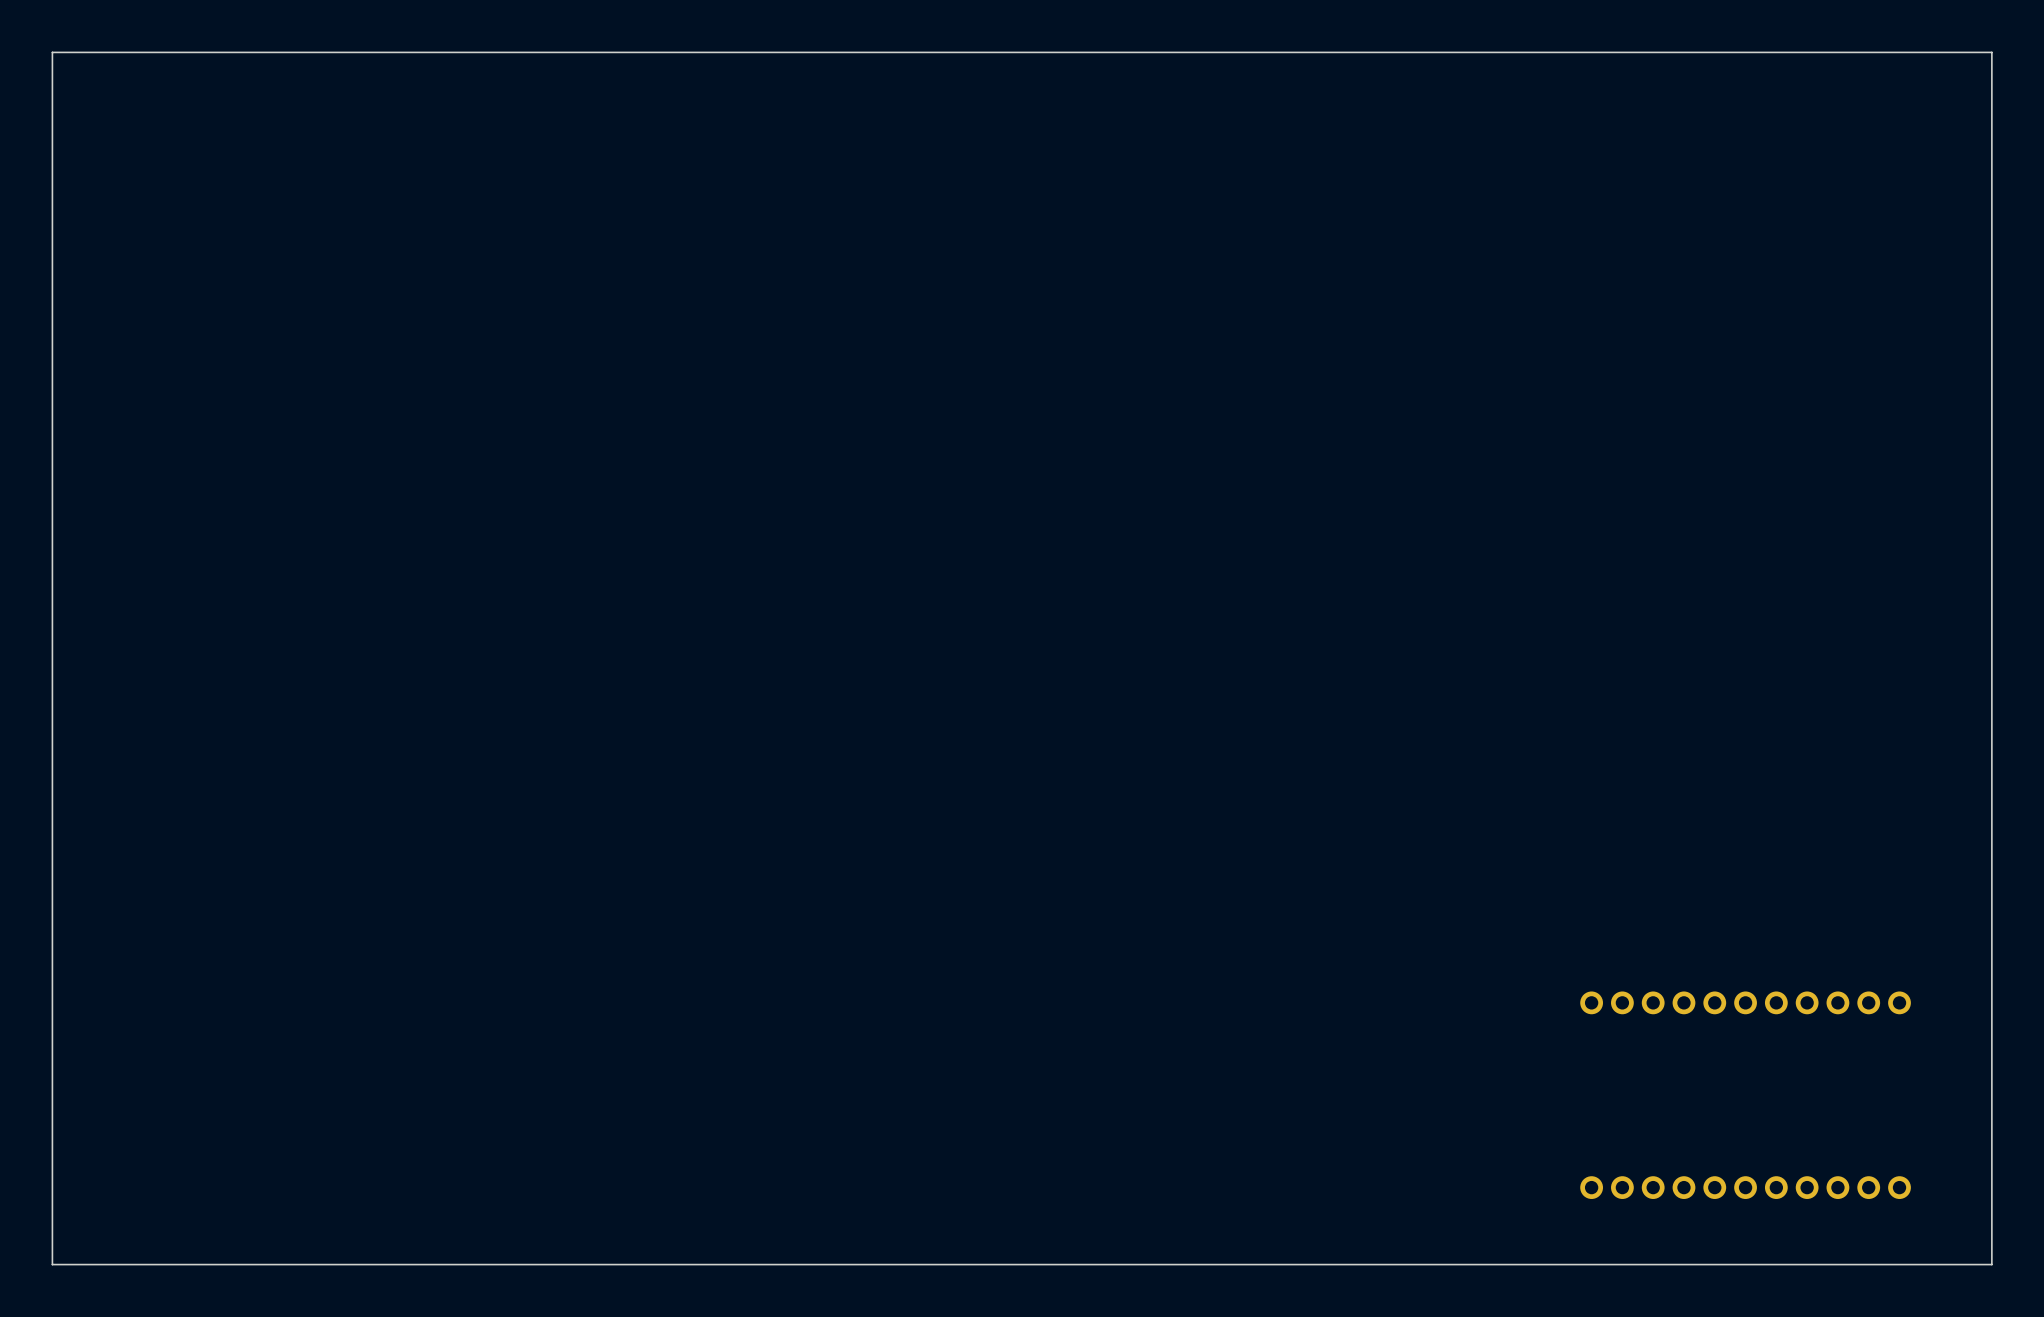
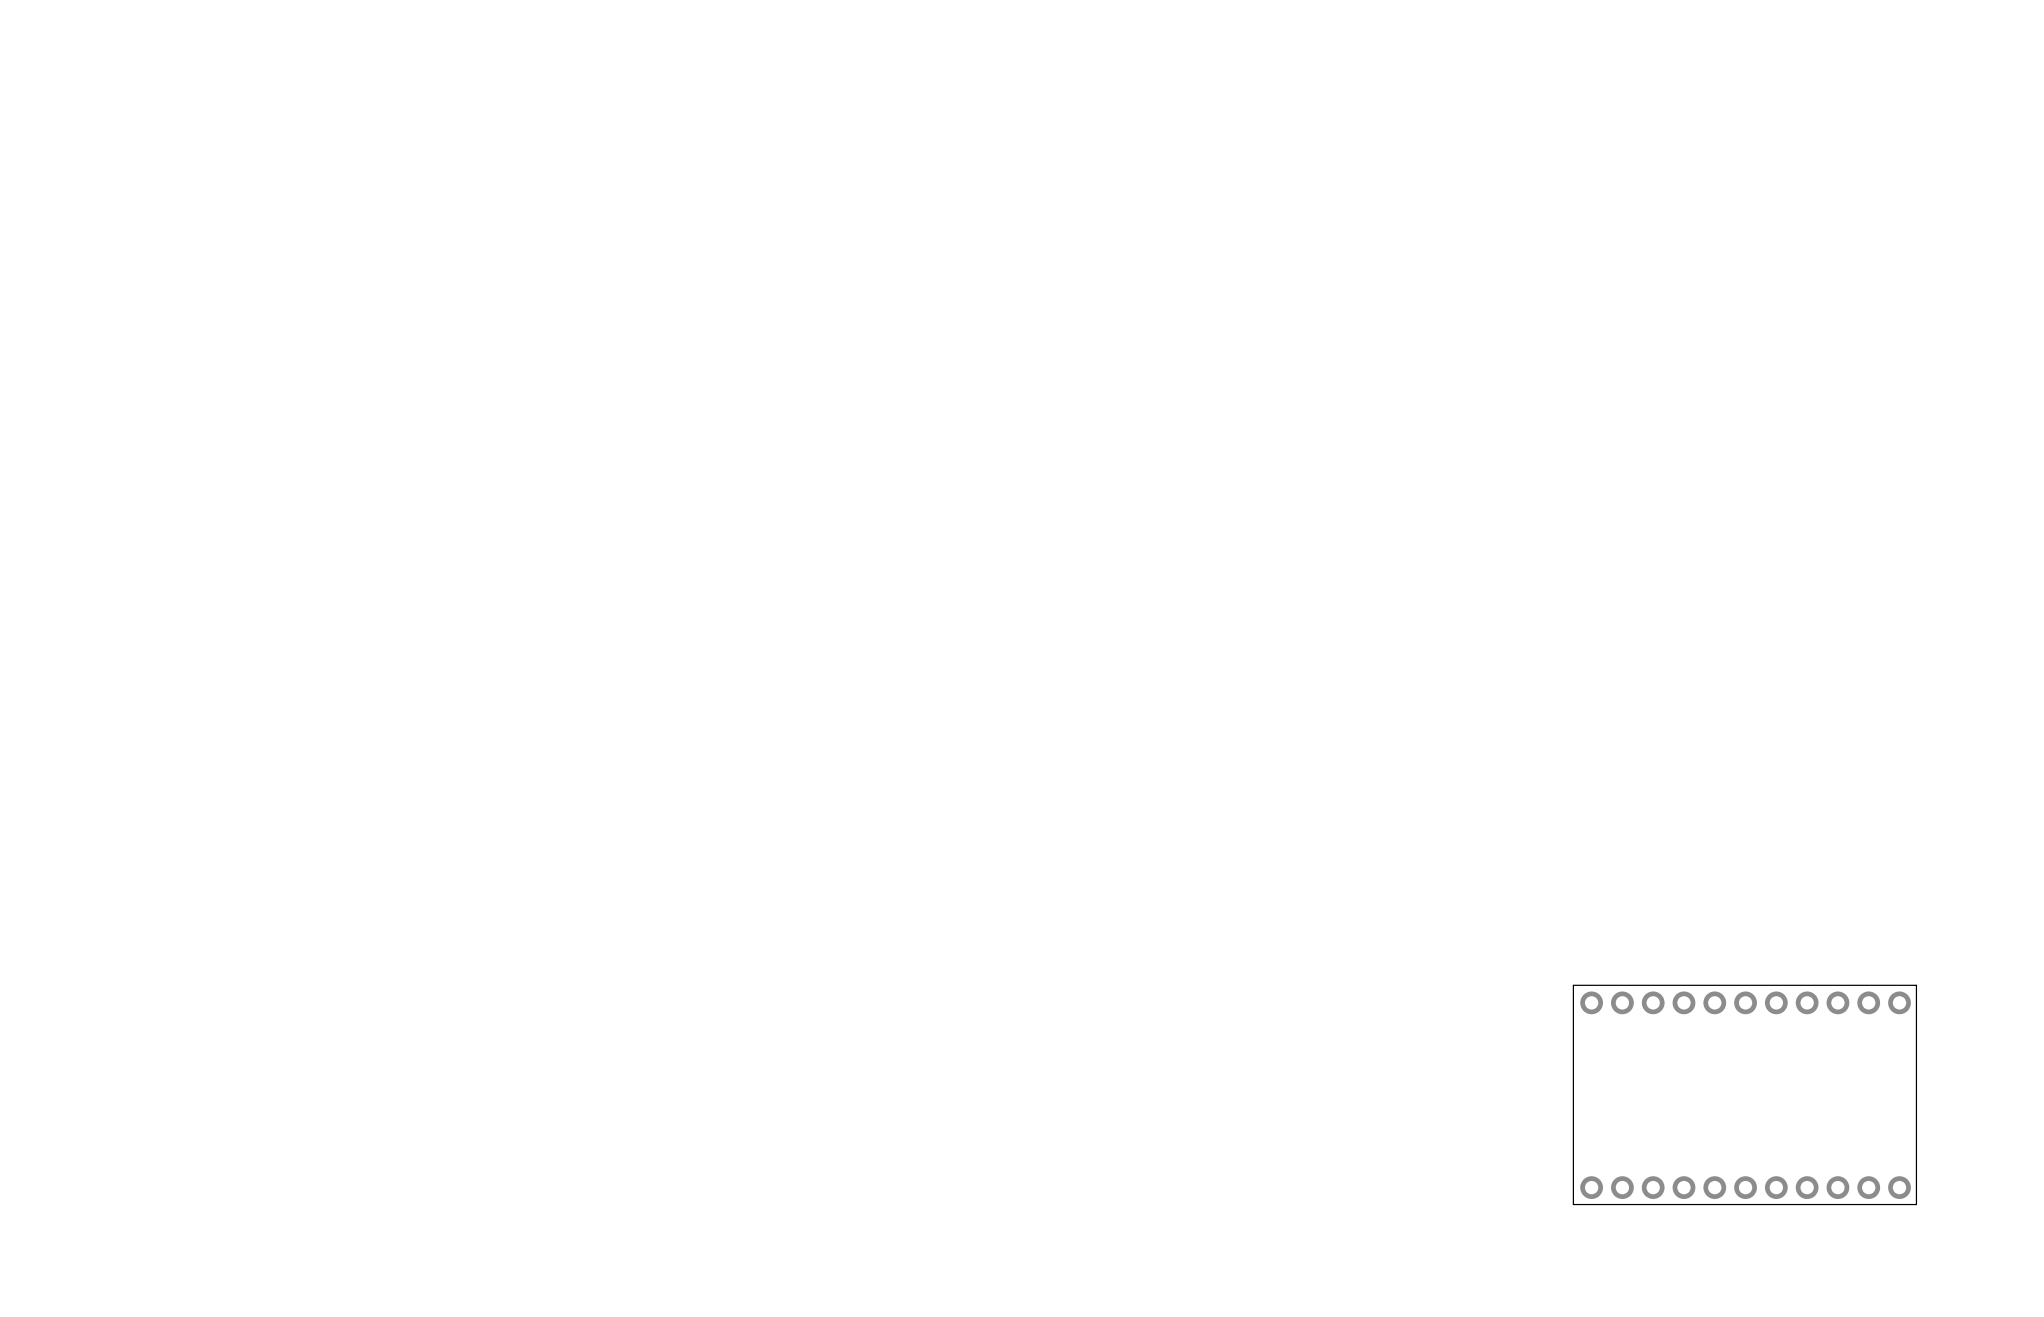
board edge: (1991, 52) (52, 52) (52, 1264) (1991, 1264) (1991, 52) -> none
board edge: none -> (1916, 985) (1573, 985) (1573, 1204) (1916, 1204) (1916, 985)

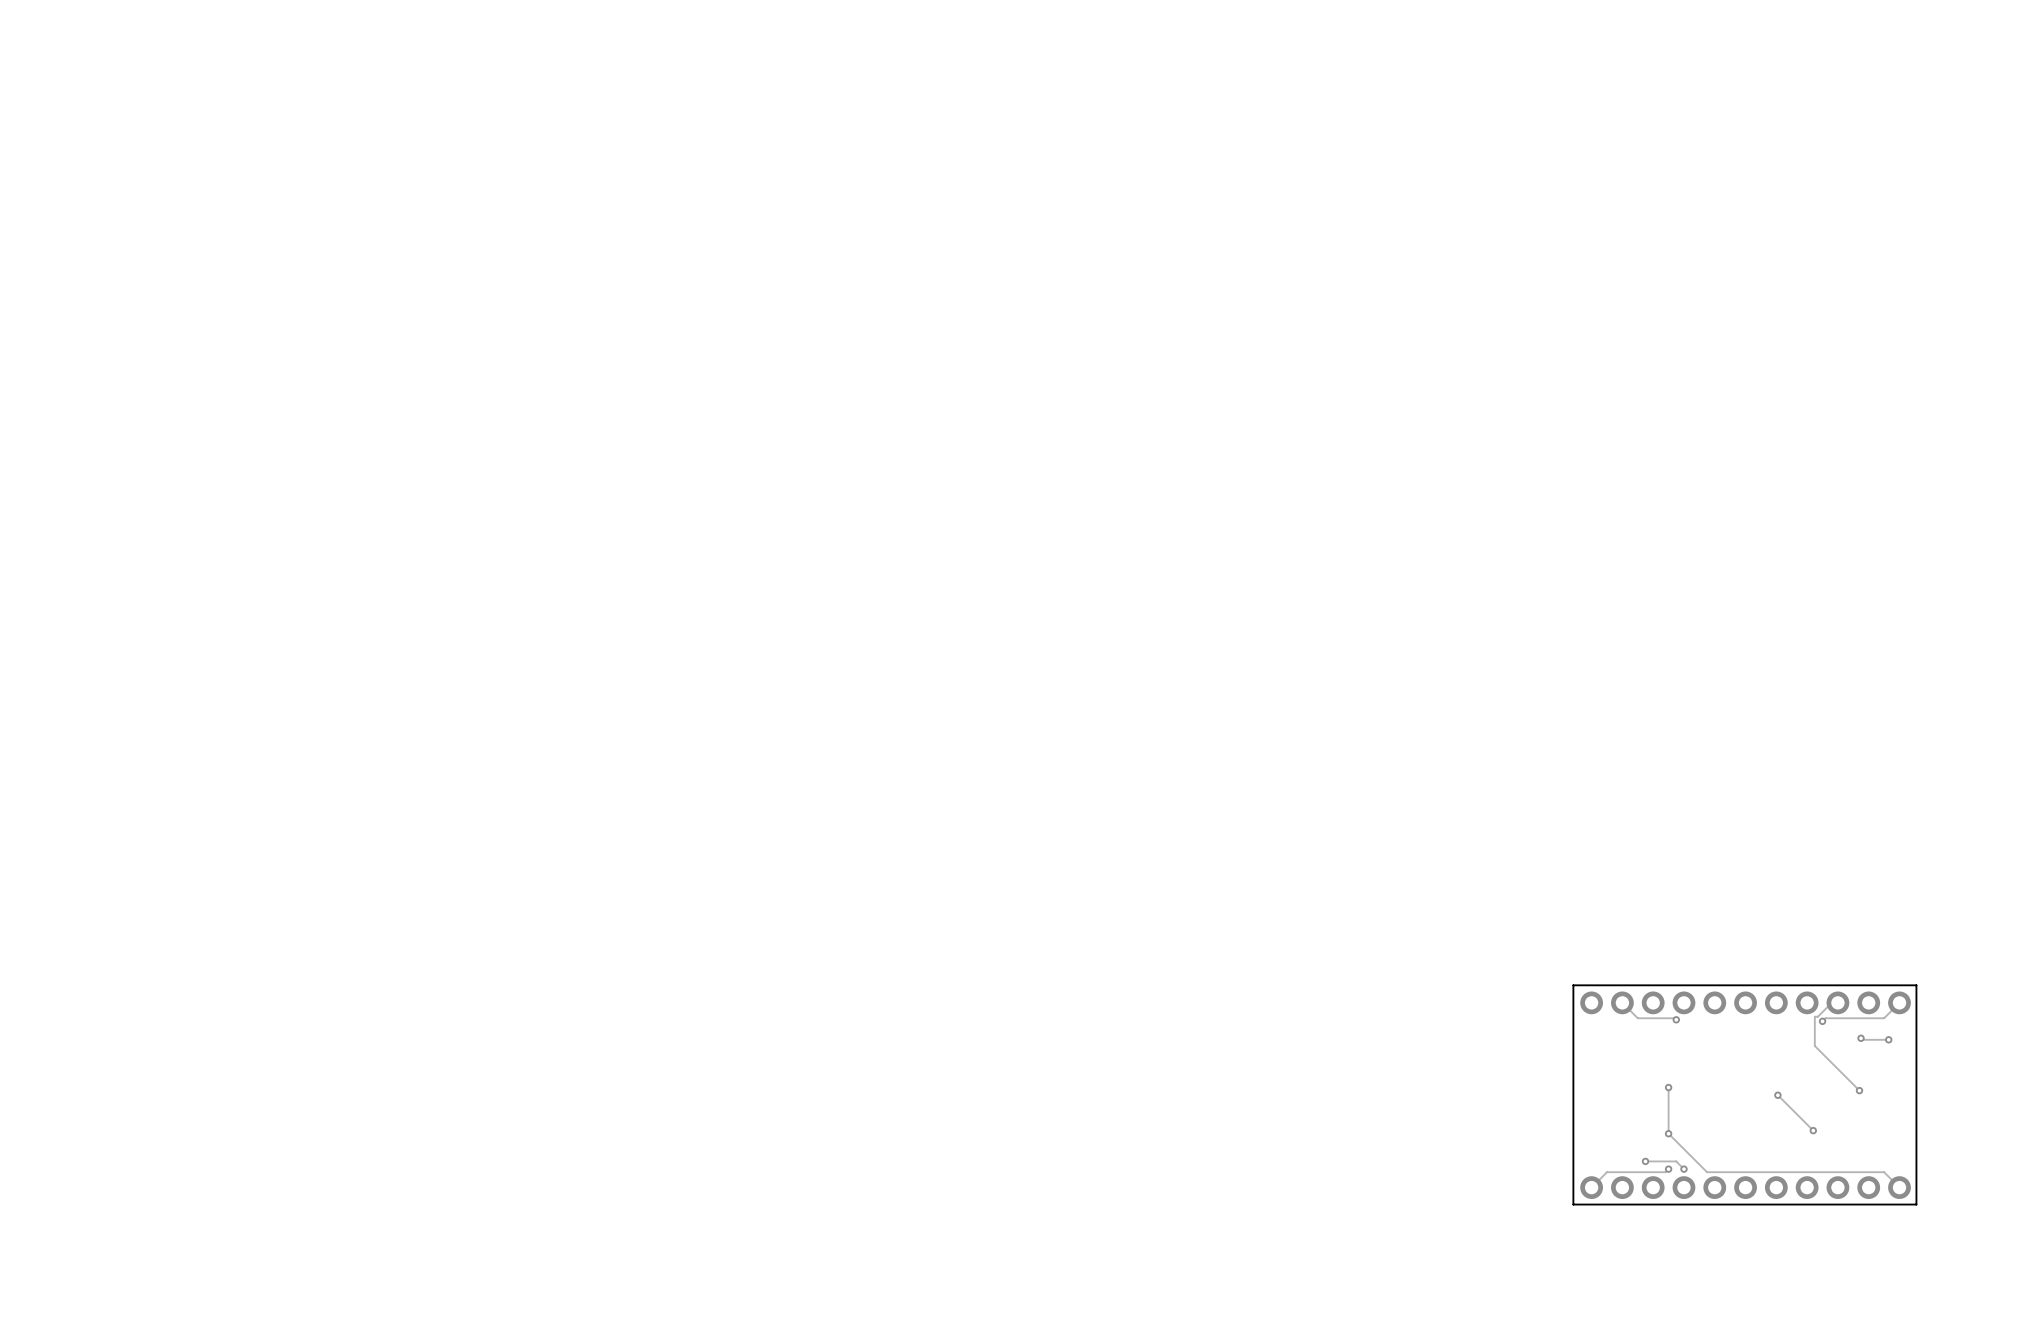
track: none -> (1622, 1002) (1637, 1018) (1676, 1019)
track: none -> (1837, 1002) (1831, 1002) (1817, 1016) (1814, 1016) (1814, 1045) (1859, 1090)
track: none -> (1899, 1002) (1884, 1018) (1825, 1018) (1822, 1021)
via: none -> (1676, 1019)
via: none -> (1822, 1021)
track: none -> (1861, 1038) (1888, 1039)
via: none -> (1861, 1038)
via: none -> (1888, 1039)
track: none -> (1668, 1087) (1668, 1133) (1707, 1172) (1884, 1172) (1899, 1187)
via: none -> (1668, 1087)
via: none -> (1859, 1090)
track: none -> (1777, 1095) (1813, 1130)
via: none -> (1777, 1095)
via: none -> (1813, 1130)
via: none -> (1668, 1133)
track: none -> (1645, 1161) (1676, 1161) (1683, 1169)
via: none -> (1645, 1161)
track: none -> (1668, 1169) (1665, 1172) (1607, 1172) (1591, 1187)
via: none -> (1668, 1169)
via: none -> (1683, 1169)

